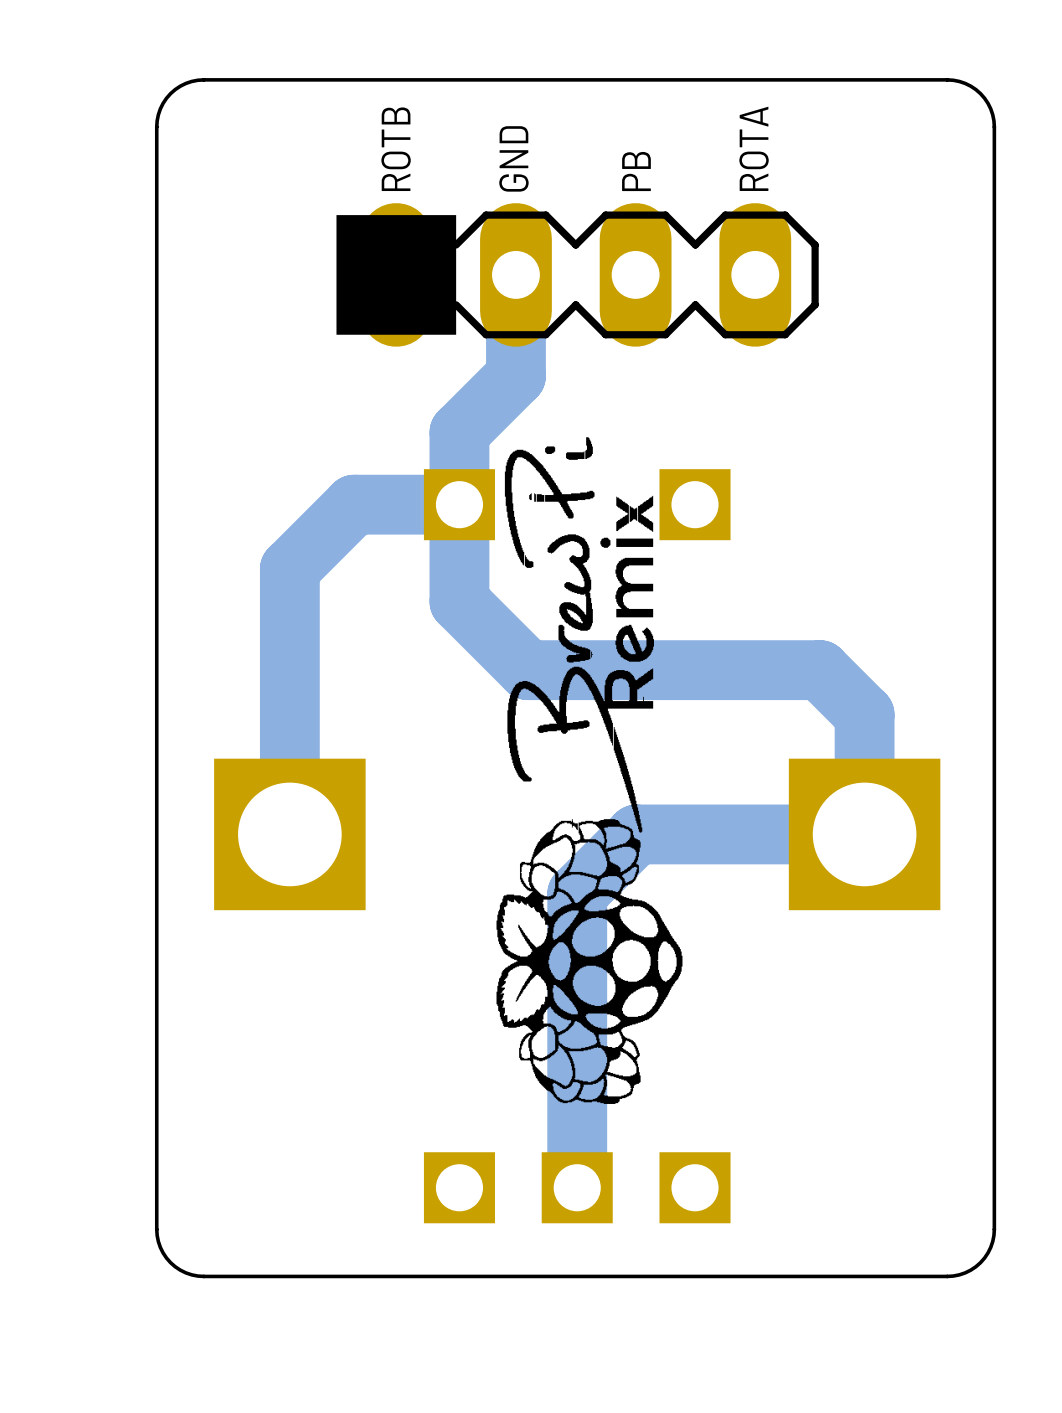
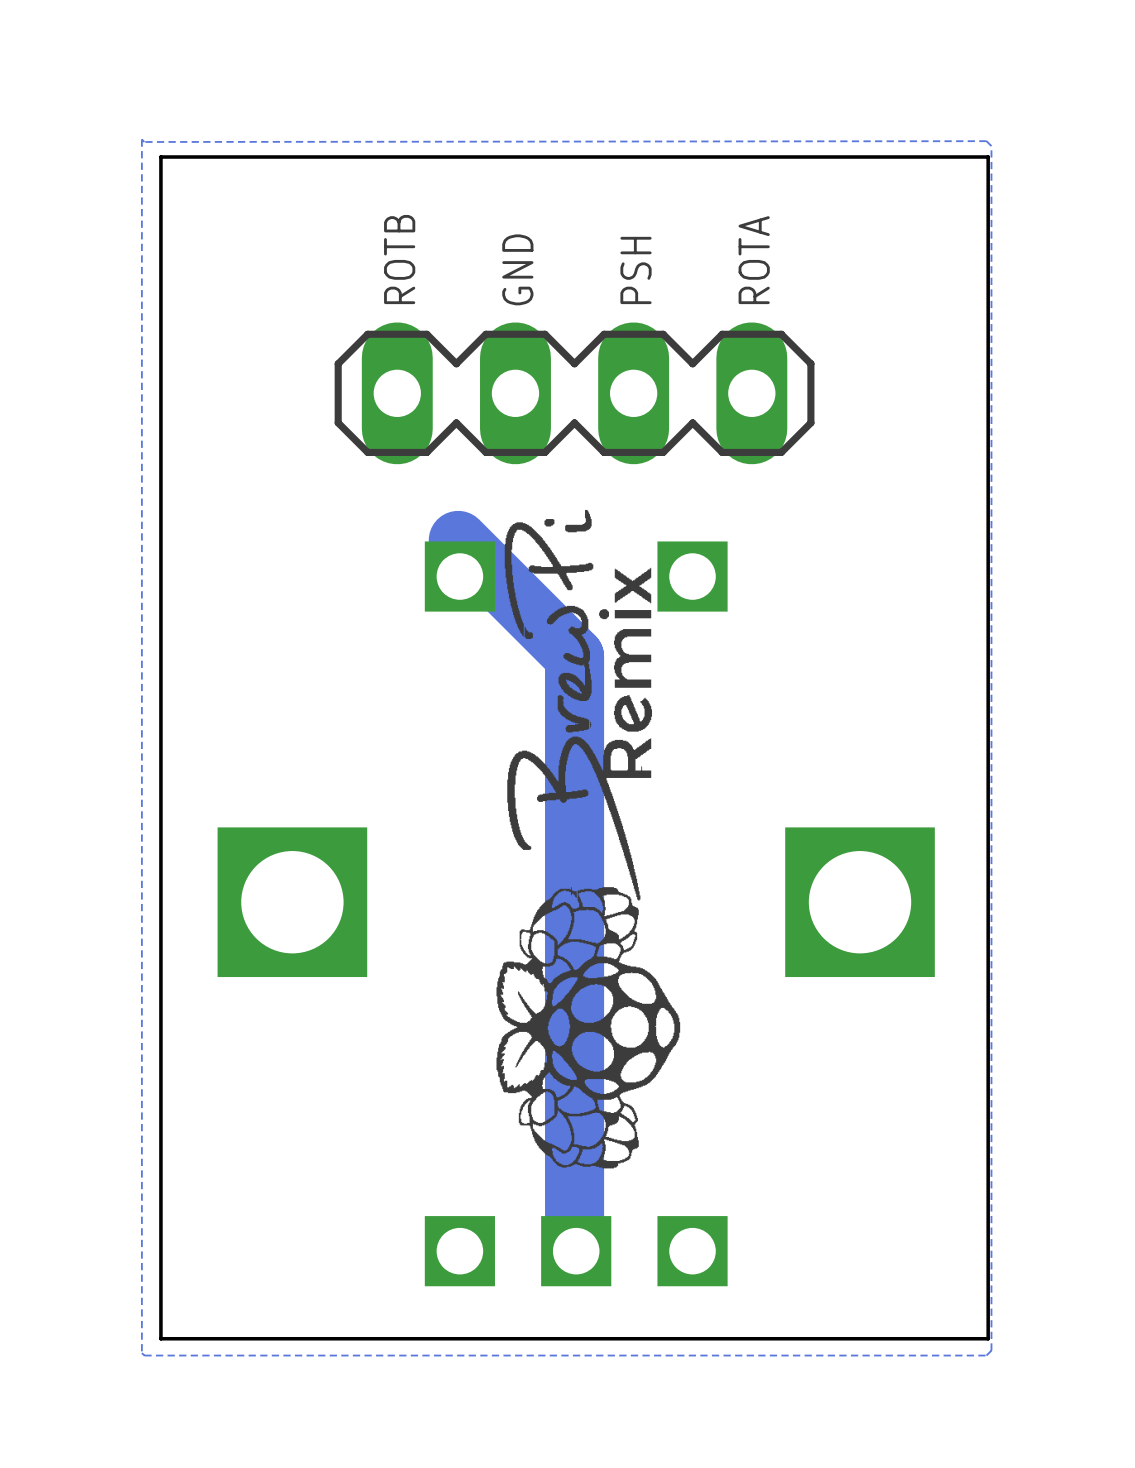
zone outline: none -> (141, 139) (144, 141) (986, 141) (991, 146) (991, 1350) (986, 1355) (144, 1355) (141, 1353) (141, 139)
board edge: (203, 79) (185, 83) (170, 93) (160, 108) (156, 126) -> (207, 157) (160, 157) (160, 203)
board edge: (947, 79) (965, 83) (980, 93) (990, 108) (994, 126) -> (941, 157) (988, 157) (988, 203)
text position: ROTA (754, 148) -> ROTA (754, 260)
text position: ROTB (396, 149) -> ROTB (399, 259)
text position: GND (513, 158) -> GND (517, 269)
text: PB (636, 171) -> PSH (636, 270)
part footprint: [336, 203, 819, 347] -> [334, 322, 815, 465]
track: (515, 274) (515, 375) (459, 432) (459, 601) (527, 670) (820, 670) (864, 714) (864, 834) (636, 834) (577, 893) (577, 1187) -> none
drawing: none -> [531, 524, 585, 574]
track: none -> (458, 540) (574, 656) (574, 1215)
track: (459, 504) (354, 504) (289, 569) (289, 834) -> none
drawing: none -> [627, 577, 637, 595]
drawing: none -> [611, 793, 613, 817]
board edge: (156, 1229) (160, 1247) (170, 1262) (185, 1272) (203, 1276) -> (160, 1292) (160, 1338) (207, 1338)
board edge: (994, 1229) (990, 1247) (980, 1262) (965, 1272) (947, 1276) -> (988, 1292) (988, 1338) (941, 1338)

